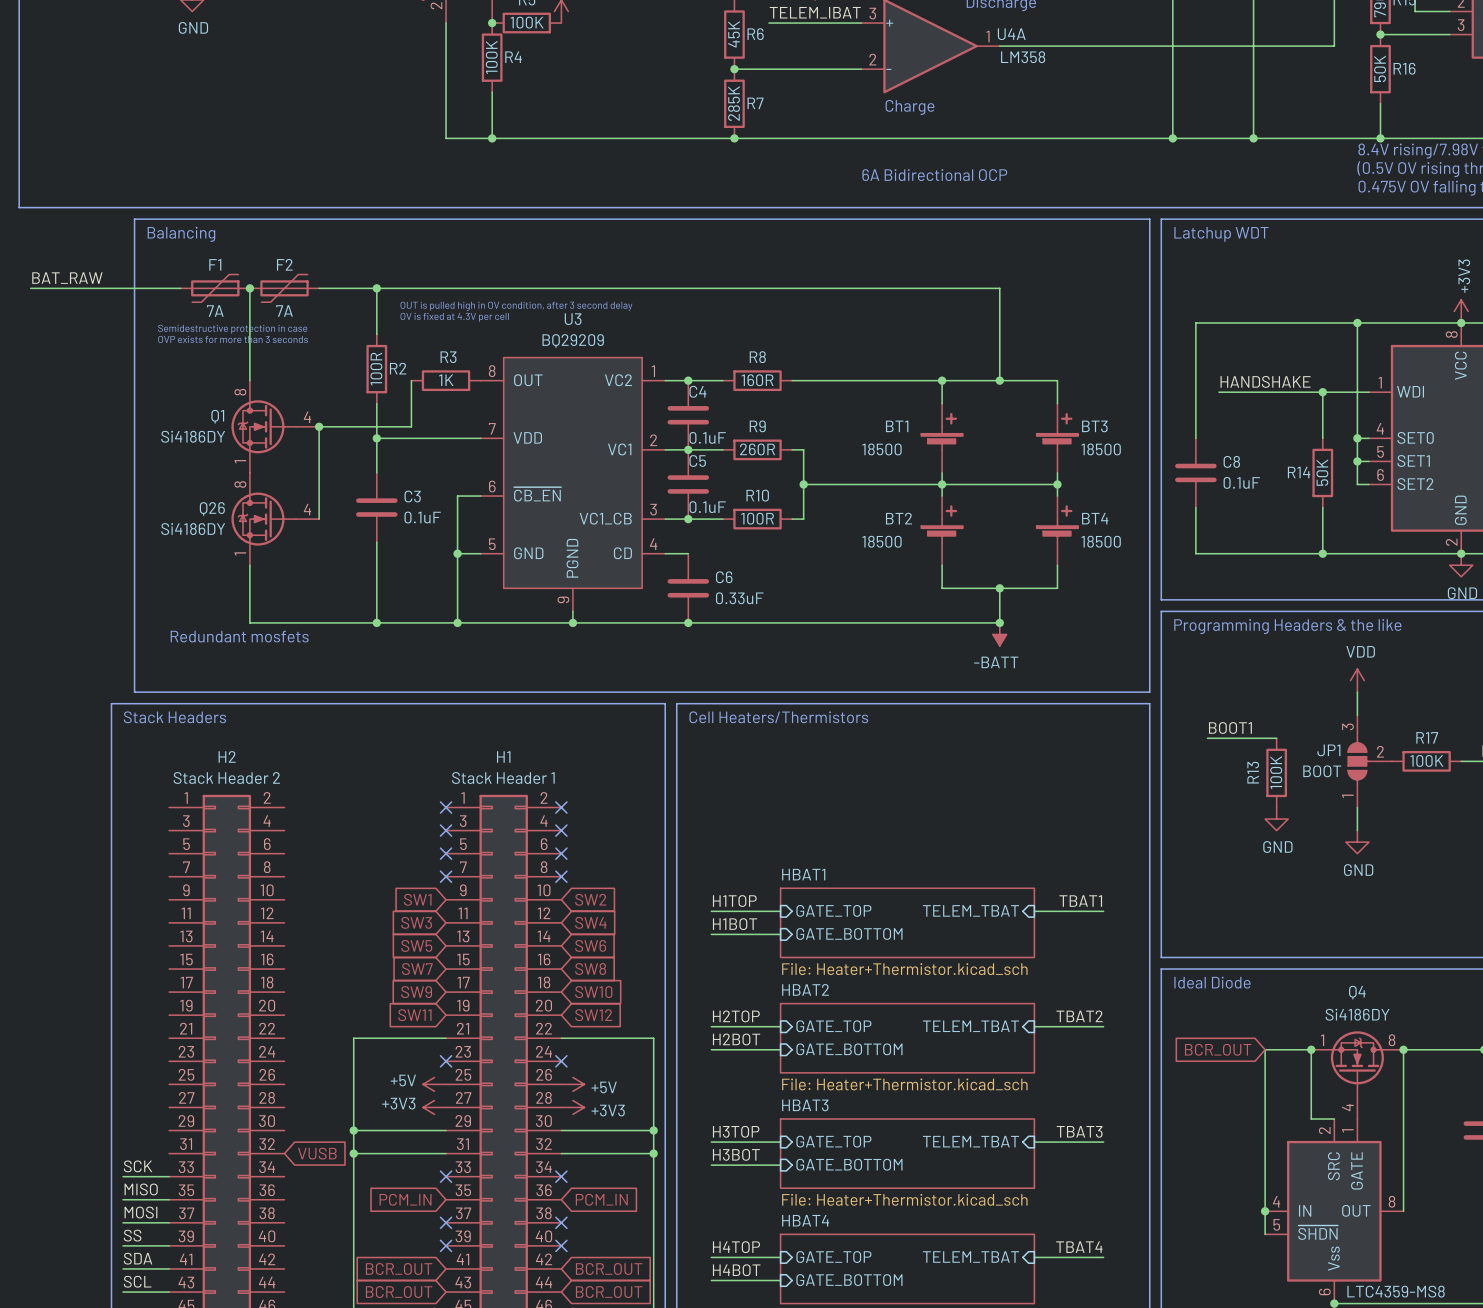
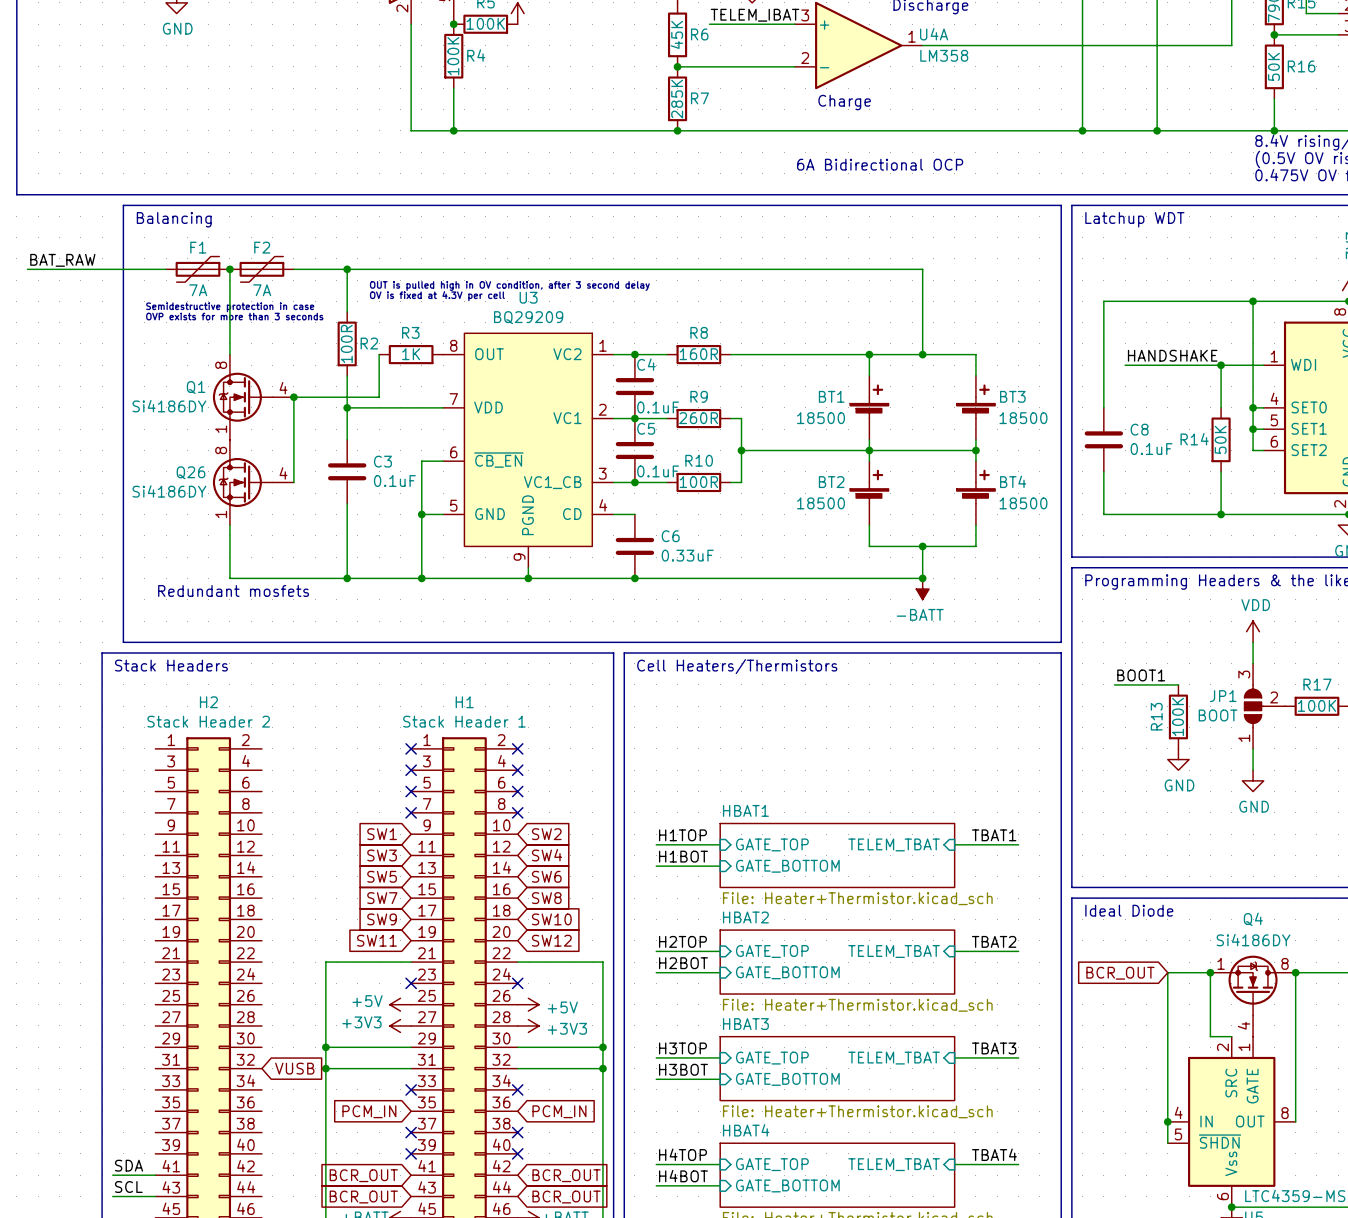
label: SCK (138, 1166) -> none
wire: (123, 1176) (169, 1176) -> none
label: MISO (141, 1189) -> none
wire: (123, 1199) (169, 1199) -> none
label: MOSI (140, 1212) -> none
wire: (123, 1222) (169, 1222) -> none
label: SS (132, 1235) -> none
wire: (123, 1245) (169, 1245) -> none

